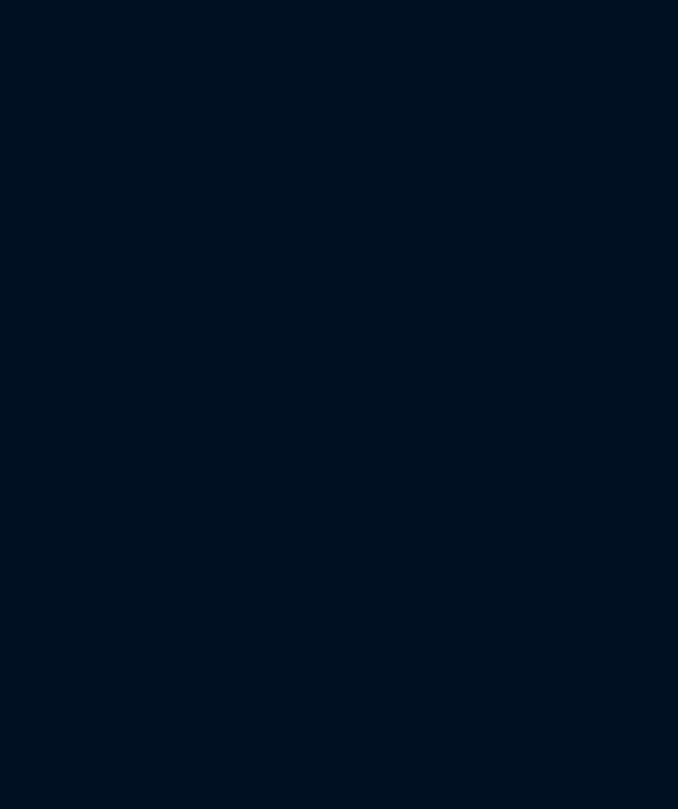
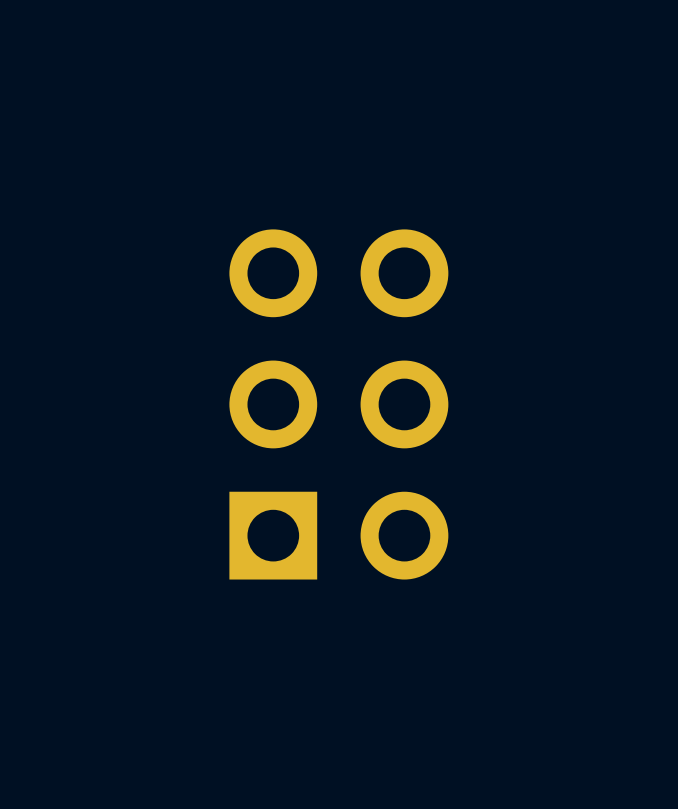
part: none -> (338, 404)

